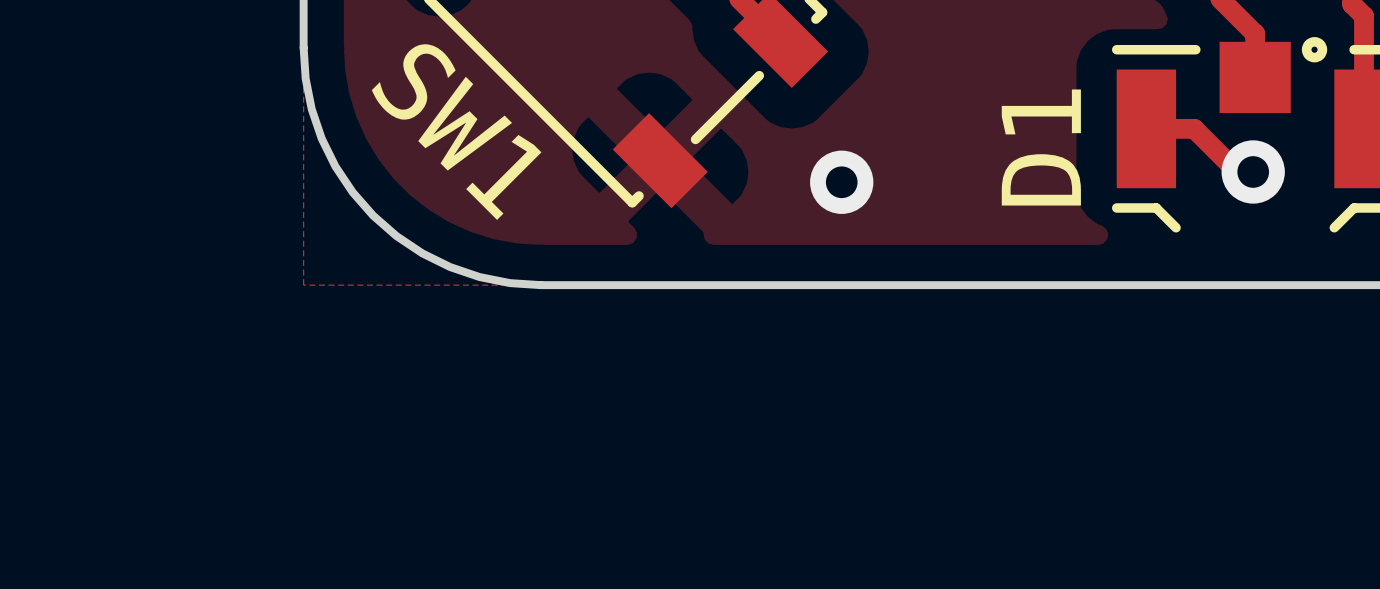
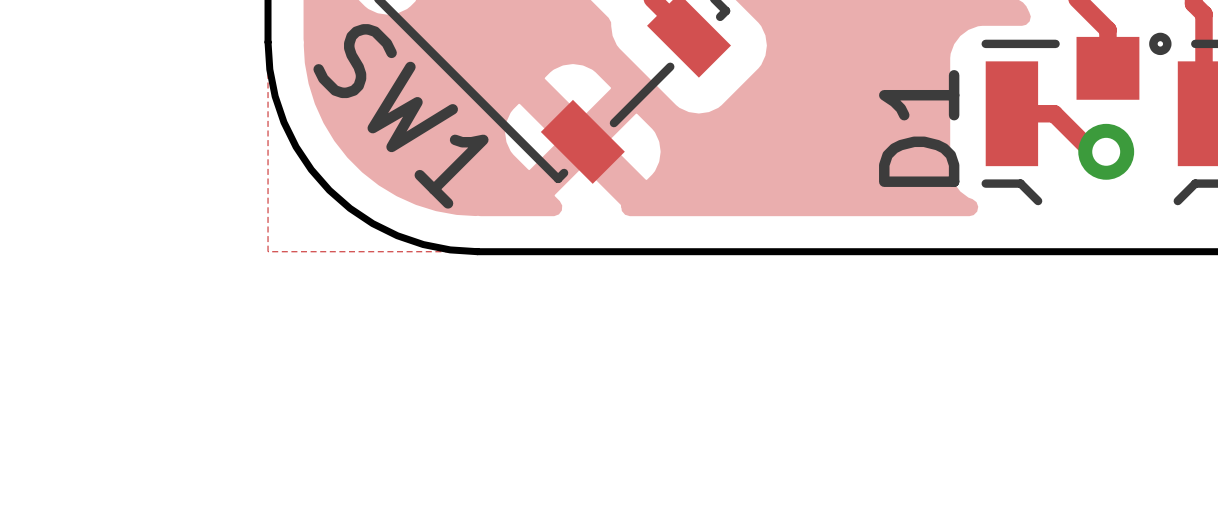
via: (841, 182) -> none

